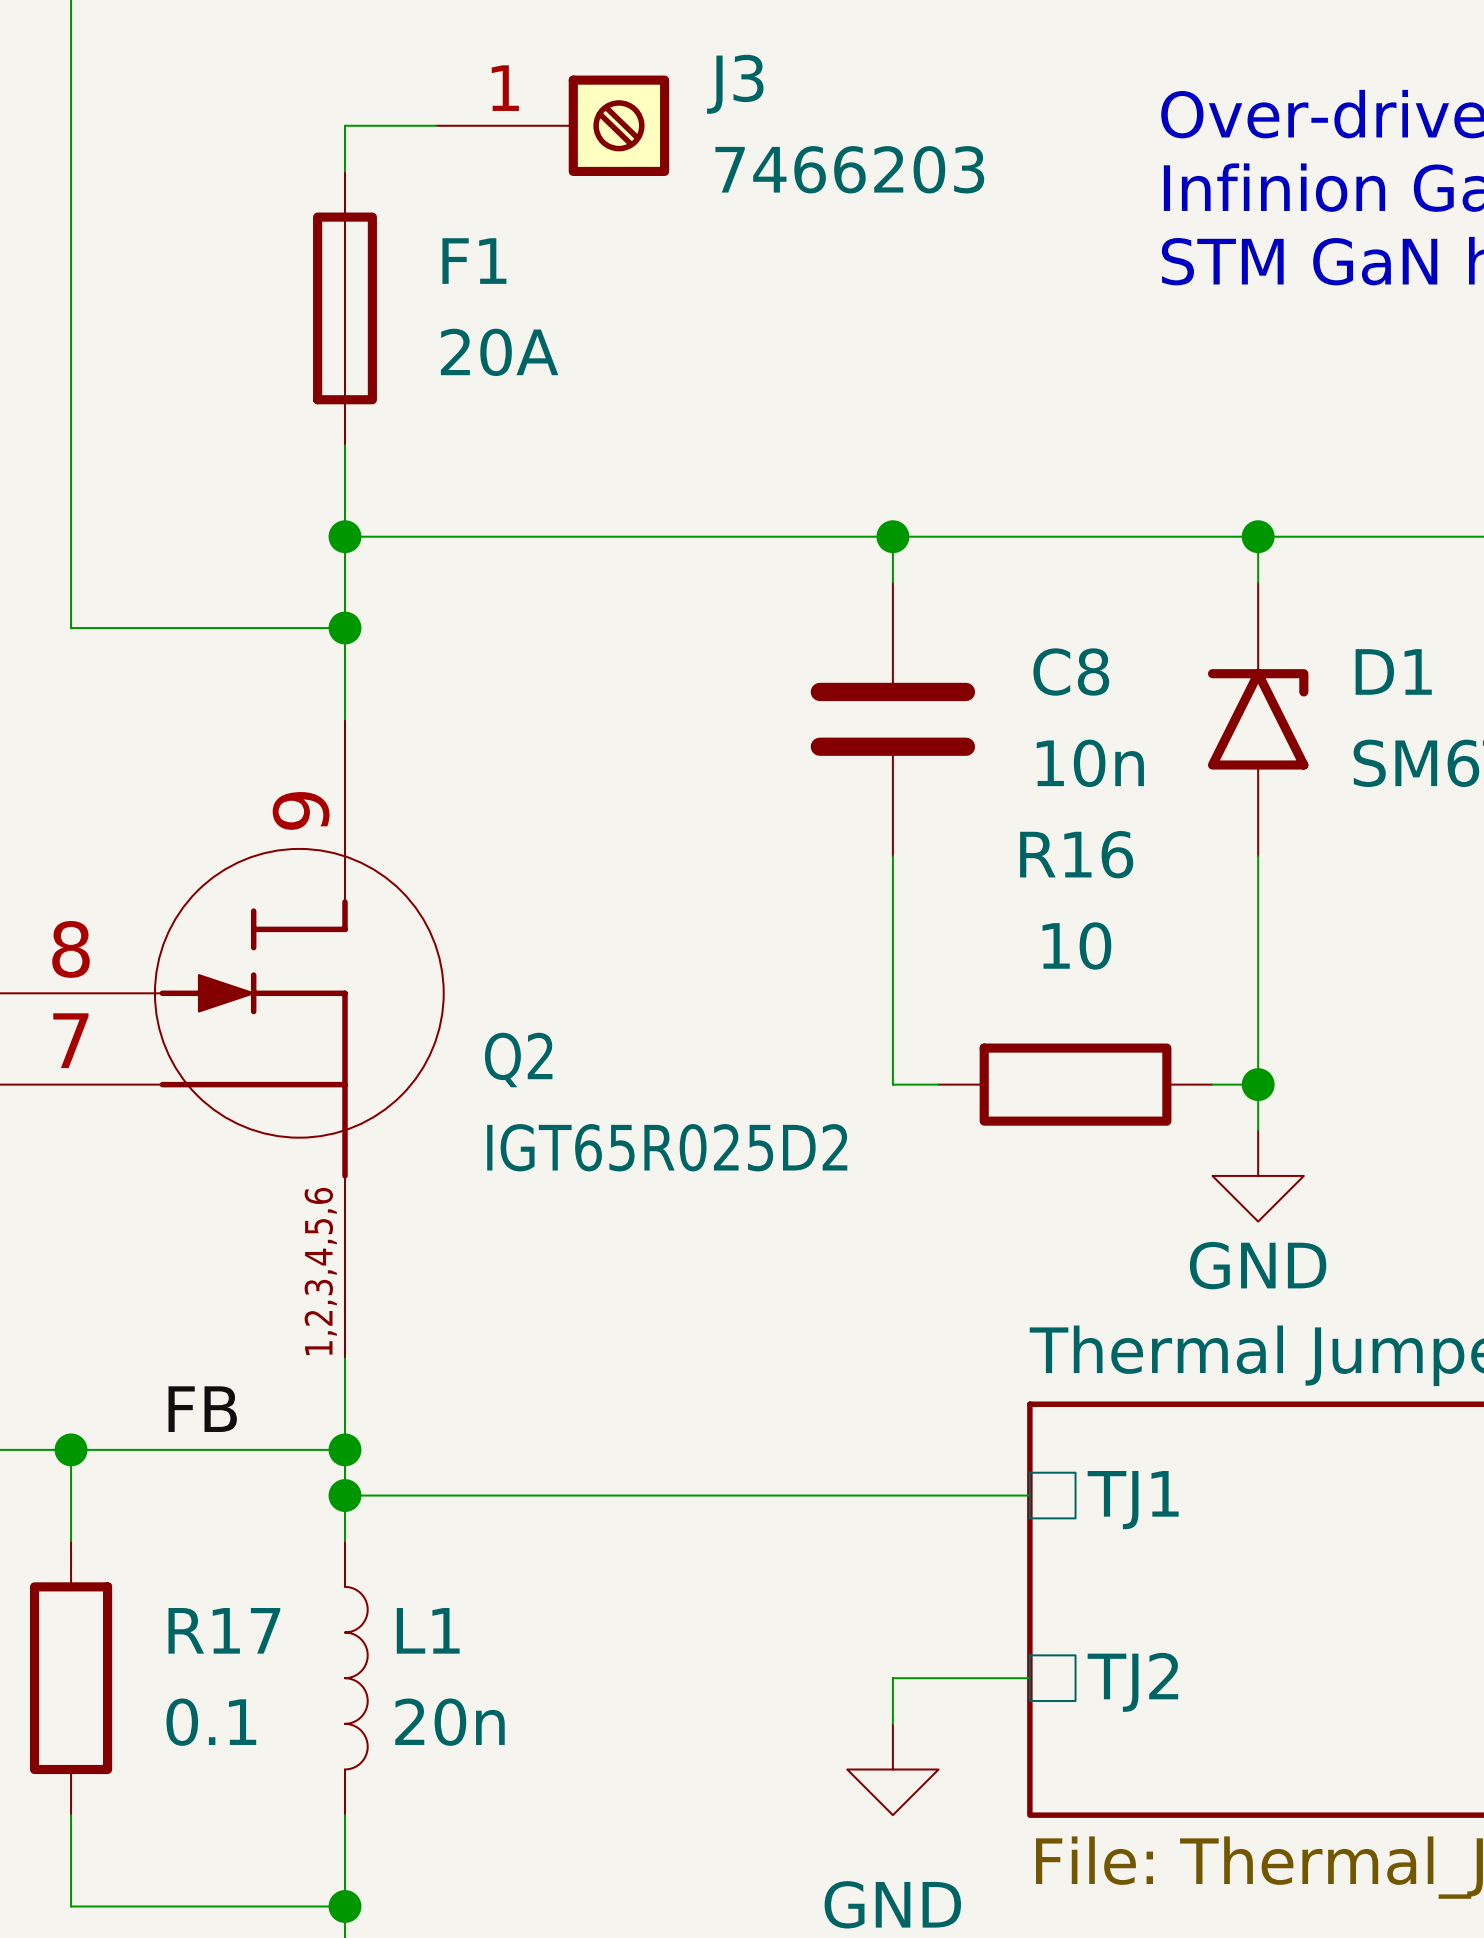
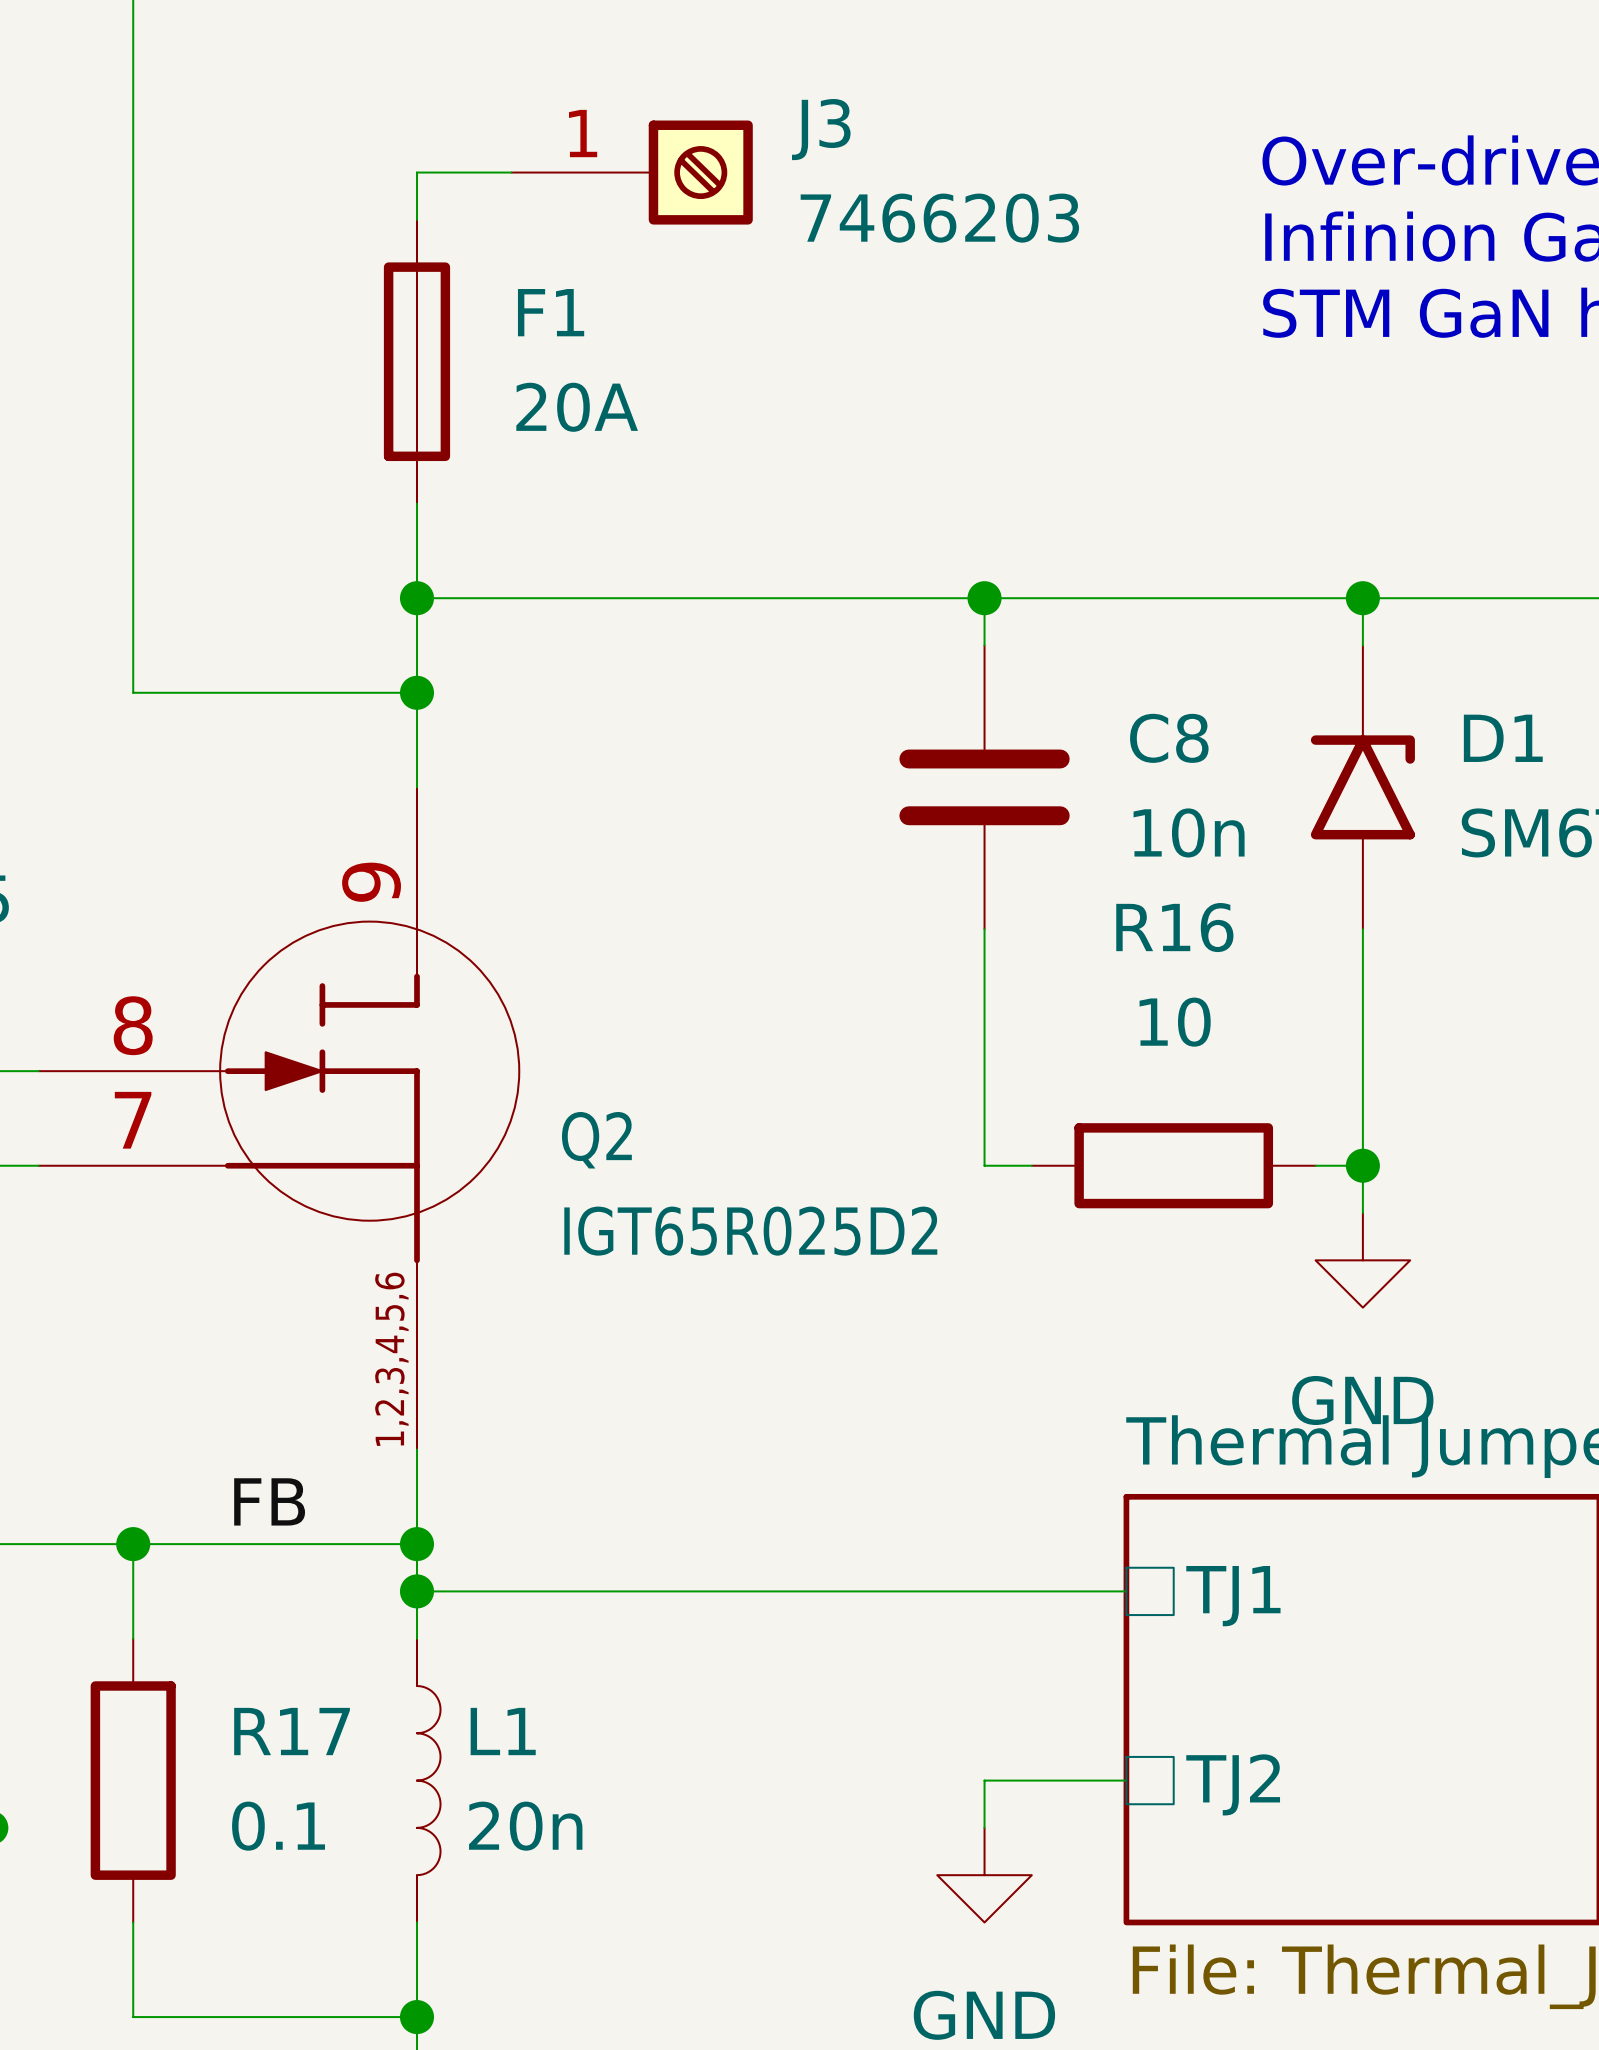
power symbol text position: GND (1258, 1265) -> GND (1362, 1400)

